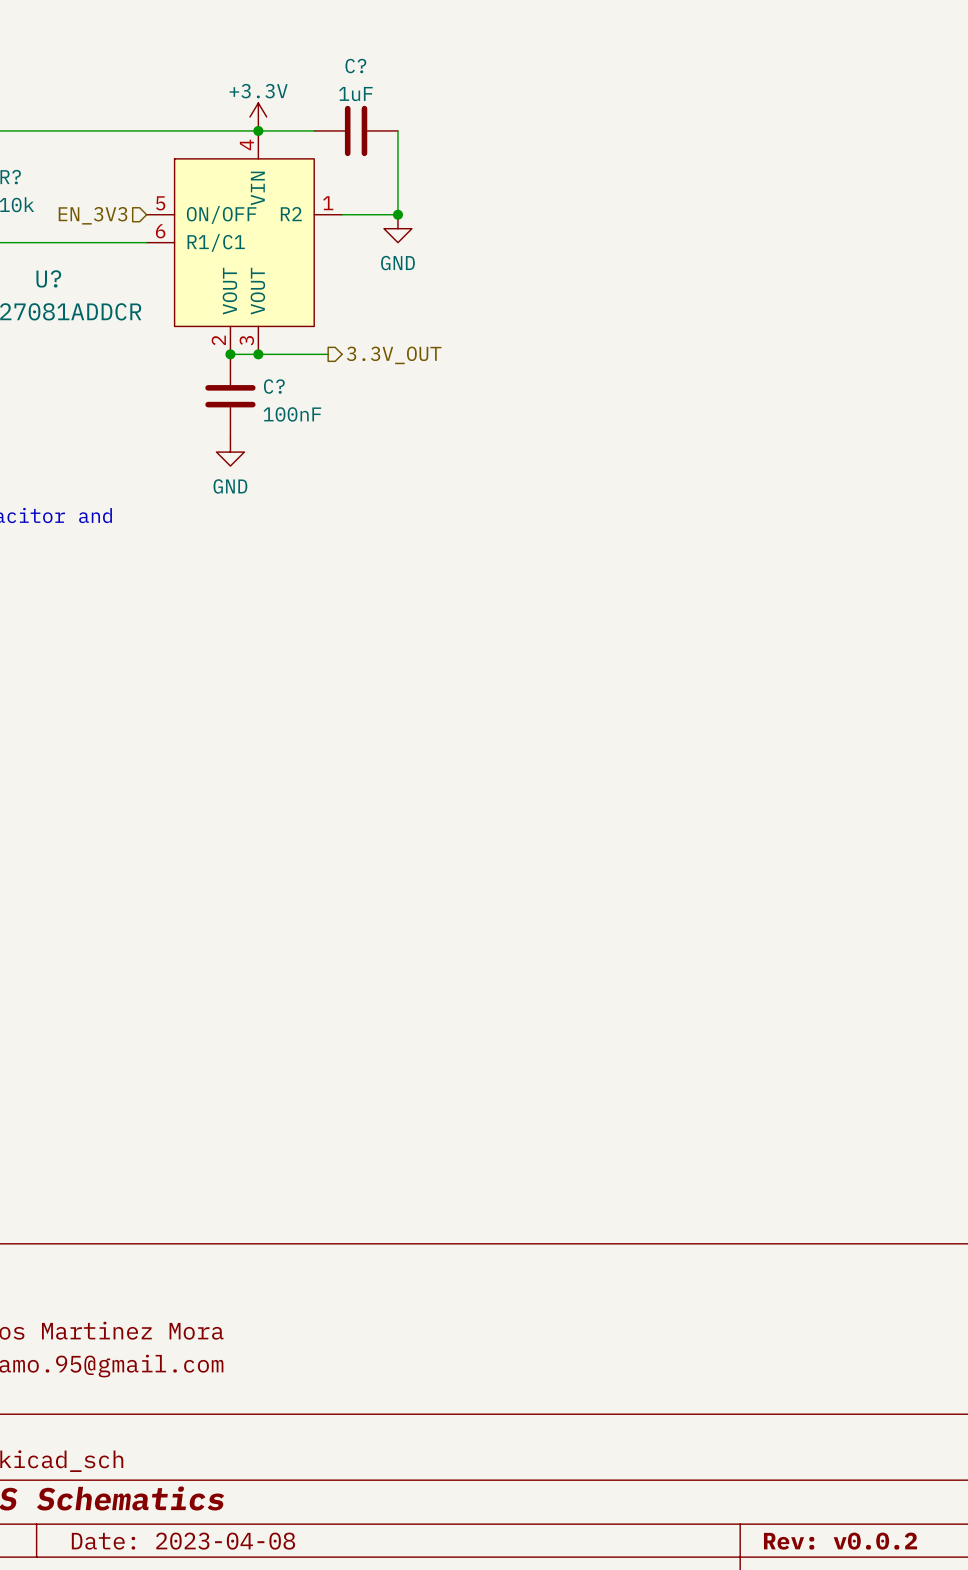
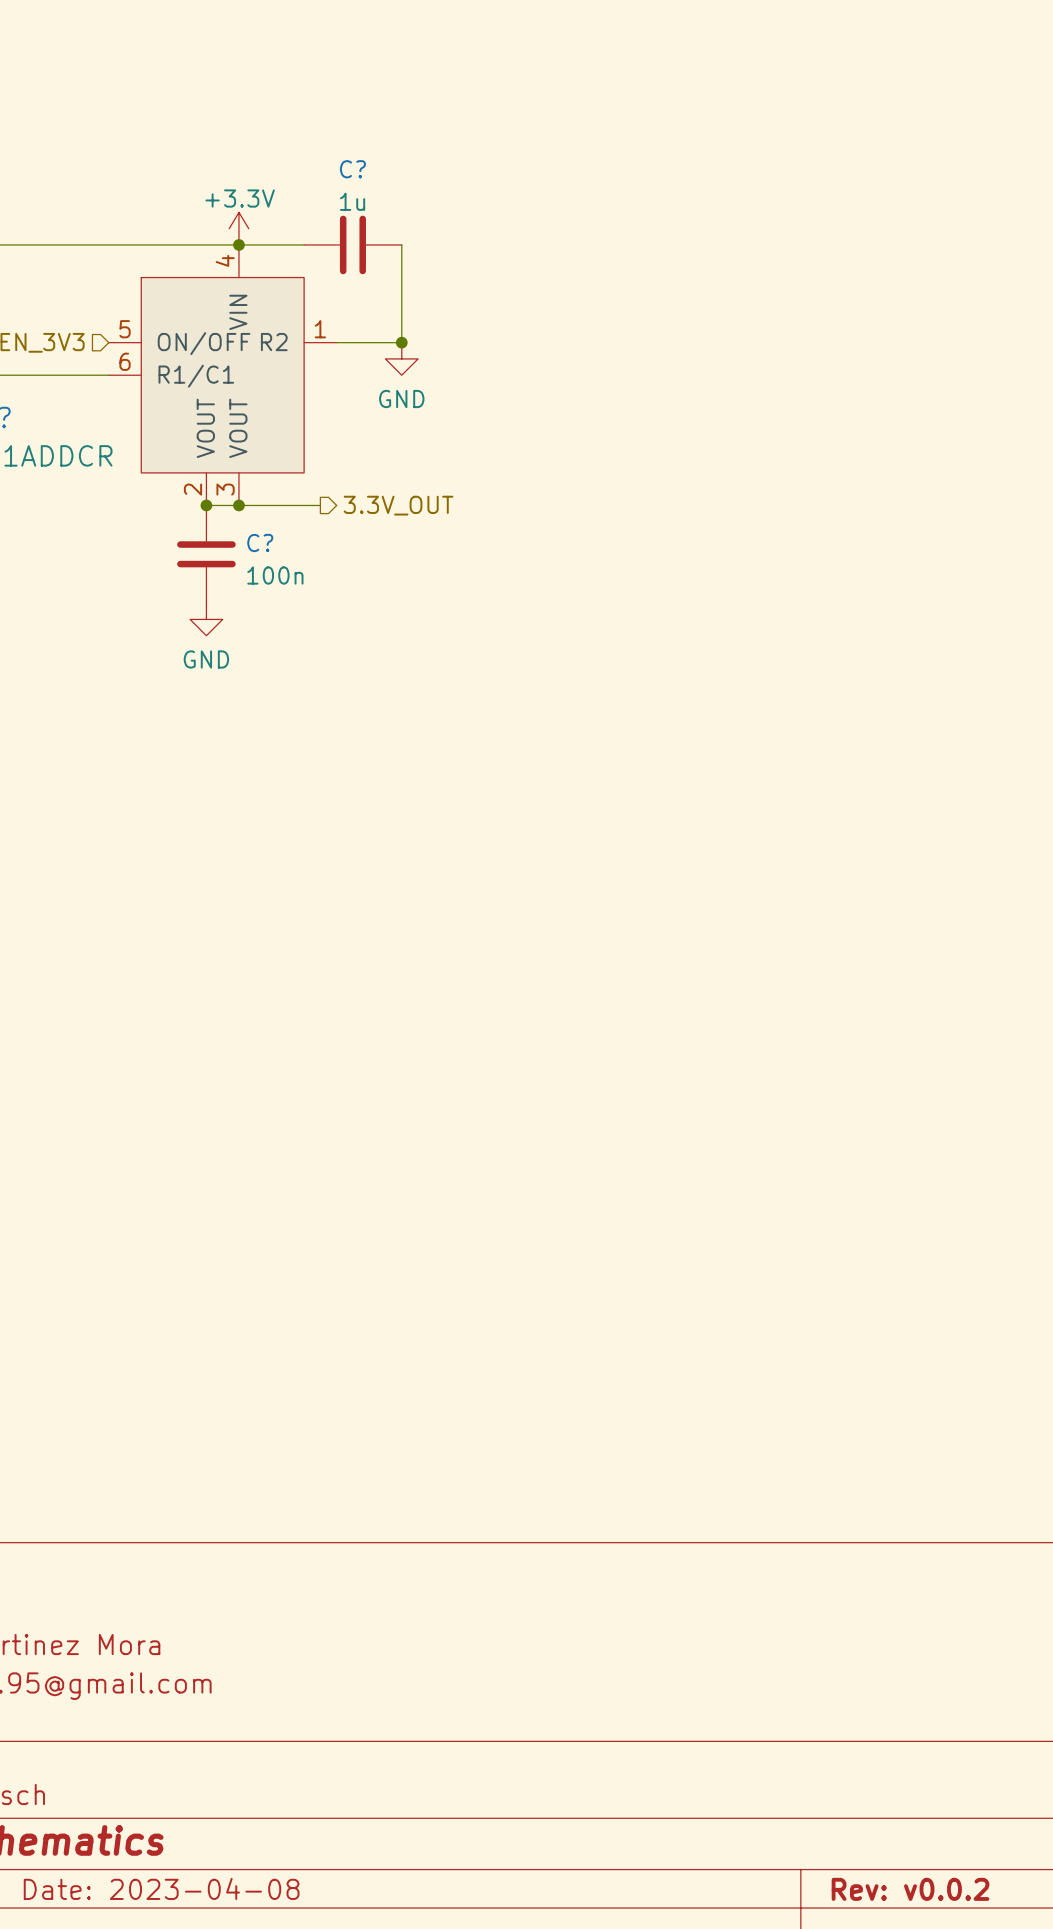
C? value: 1uF (355, 94) -> 1u (352, 201)
C? value: 100nF (292, 414) -> 100n (275, 575)

